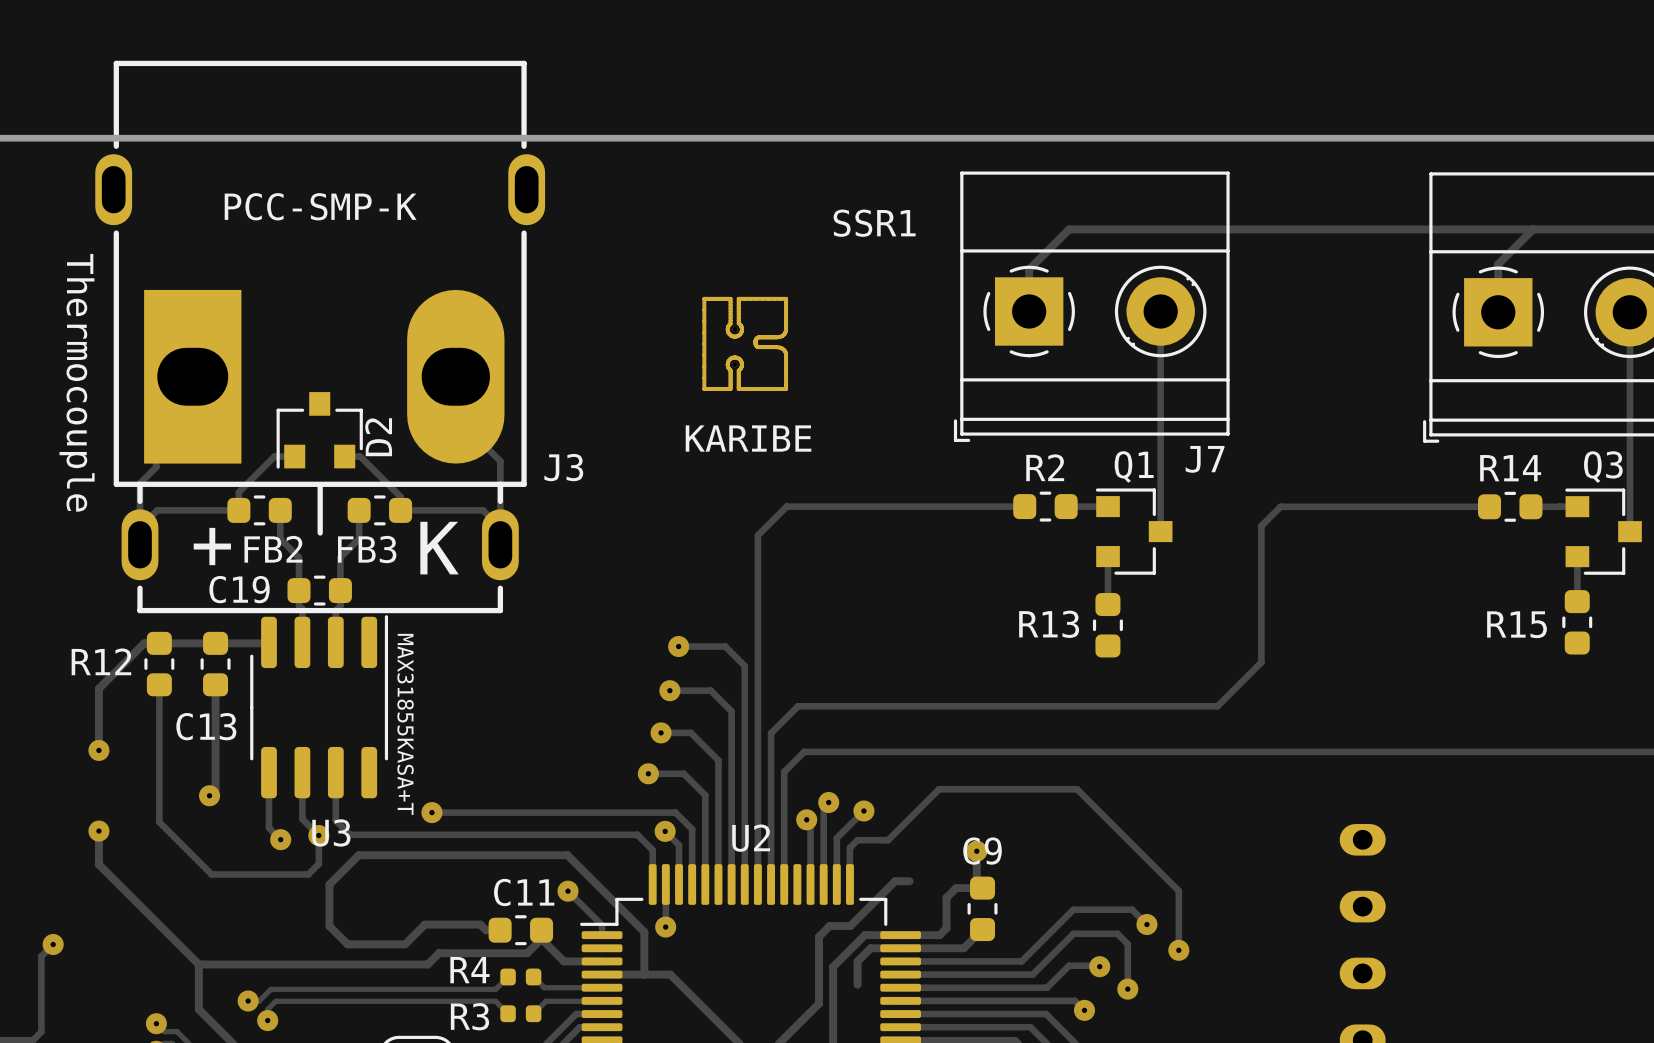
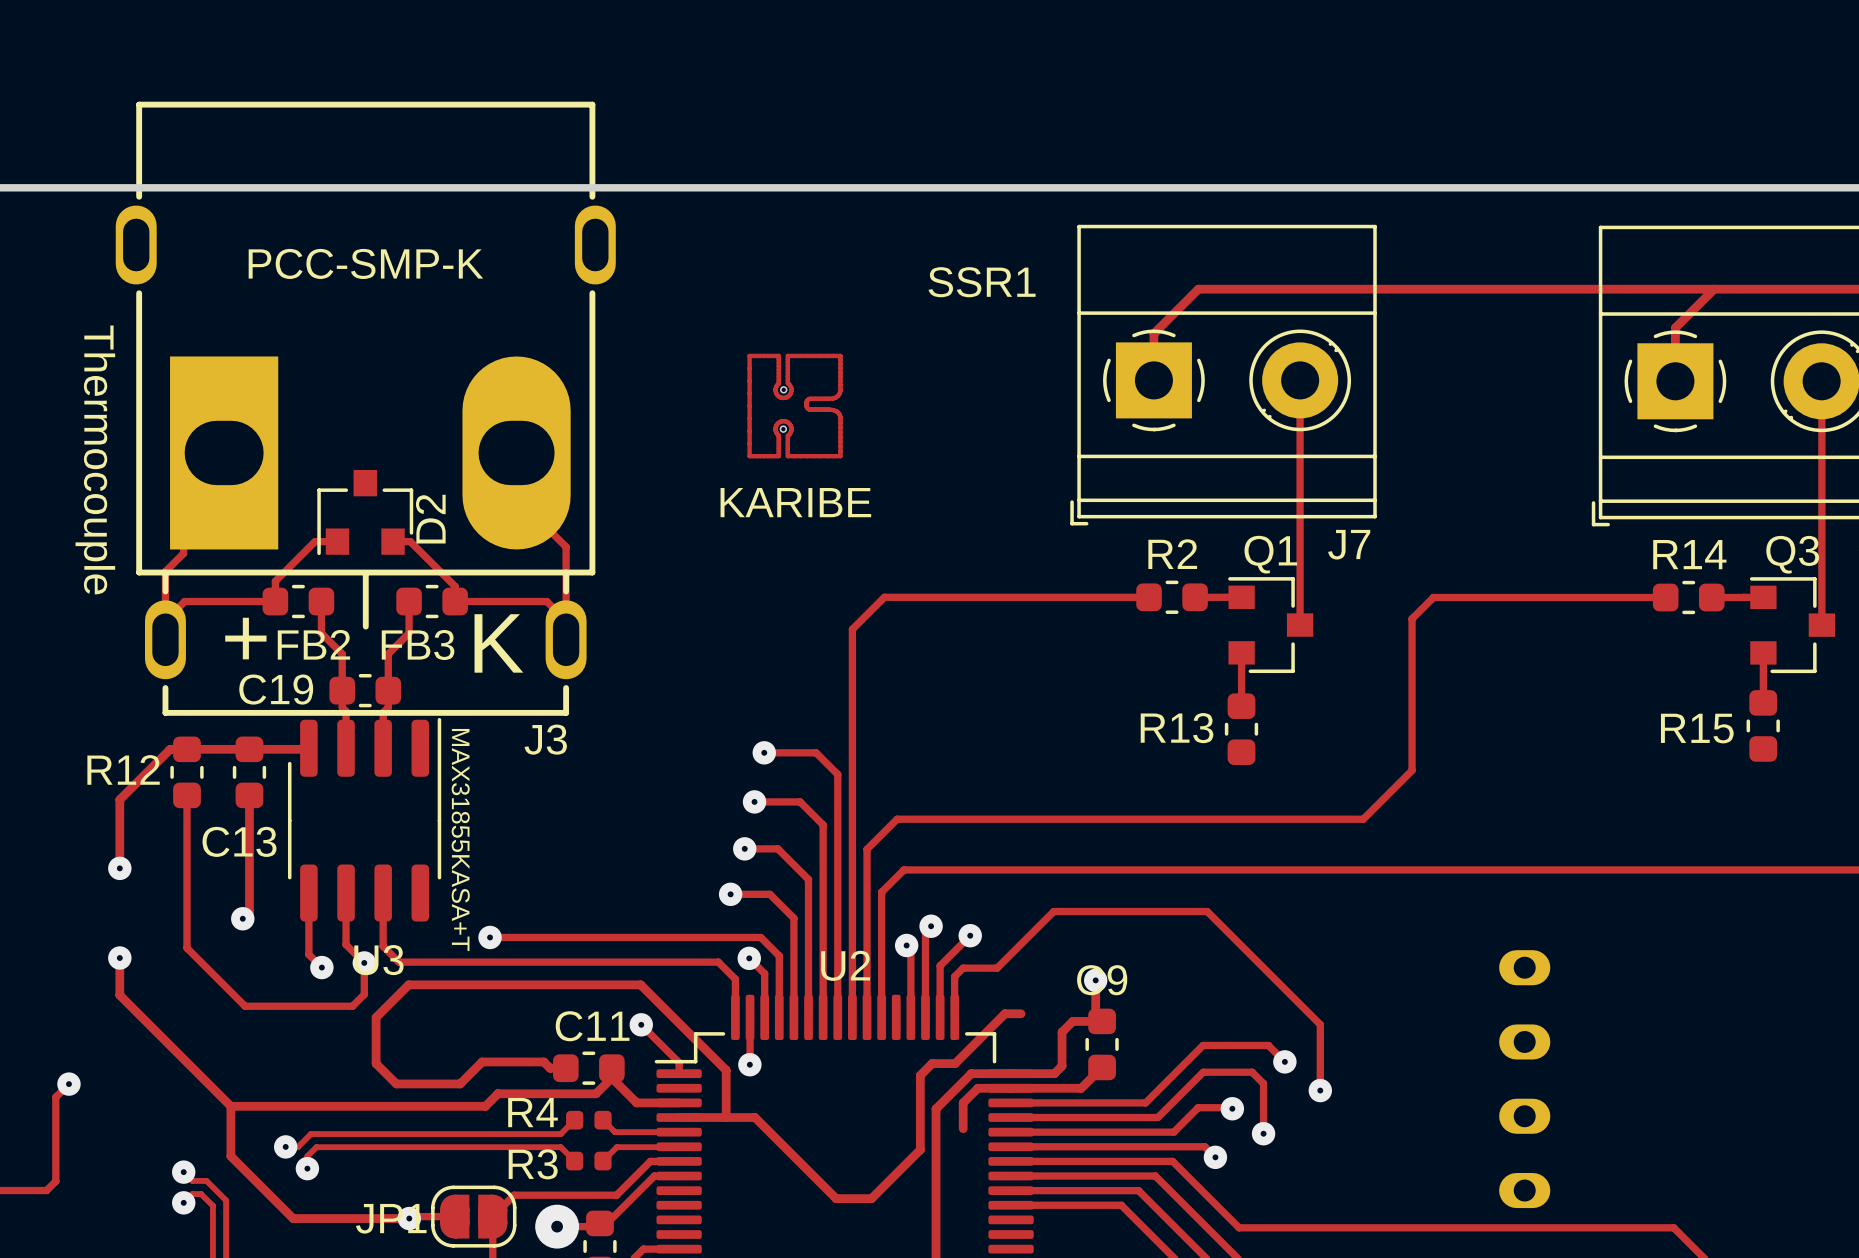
part: none -> (795, 406)
part: (745, 343) -> none
text position: KARIBE (748, 438) -> KARIBE (795, 502)
J3 name position: J3 (563, 467) -> J3 (545, 739)

